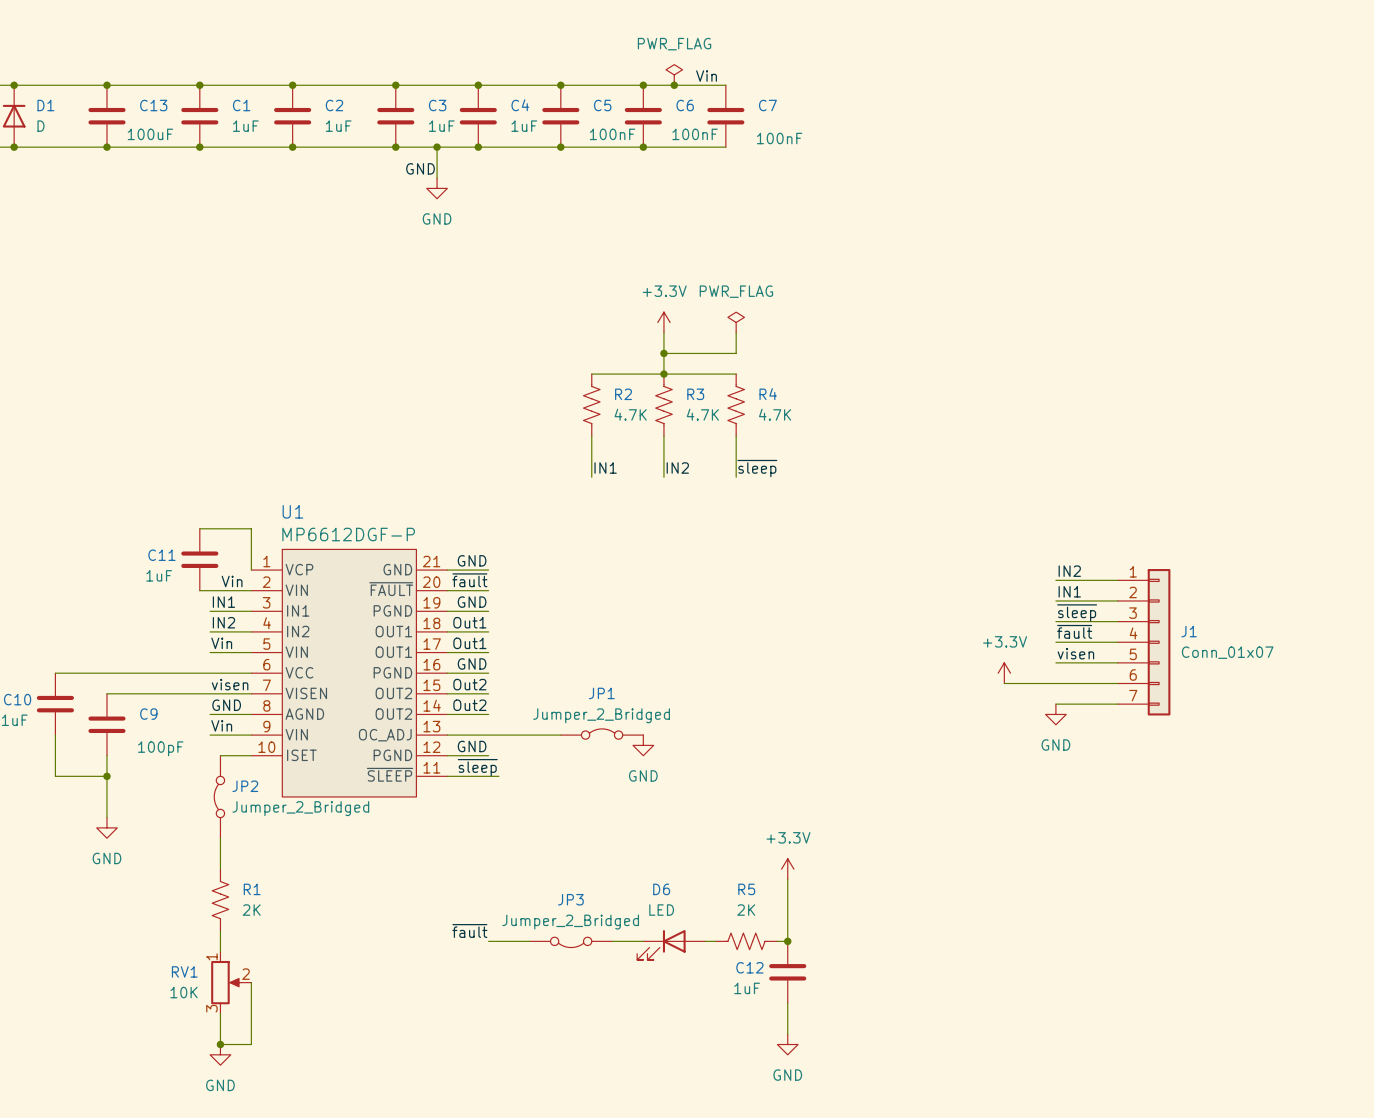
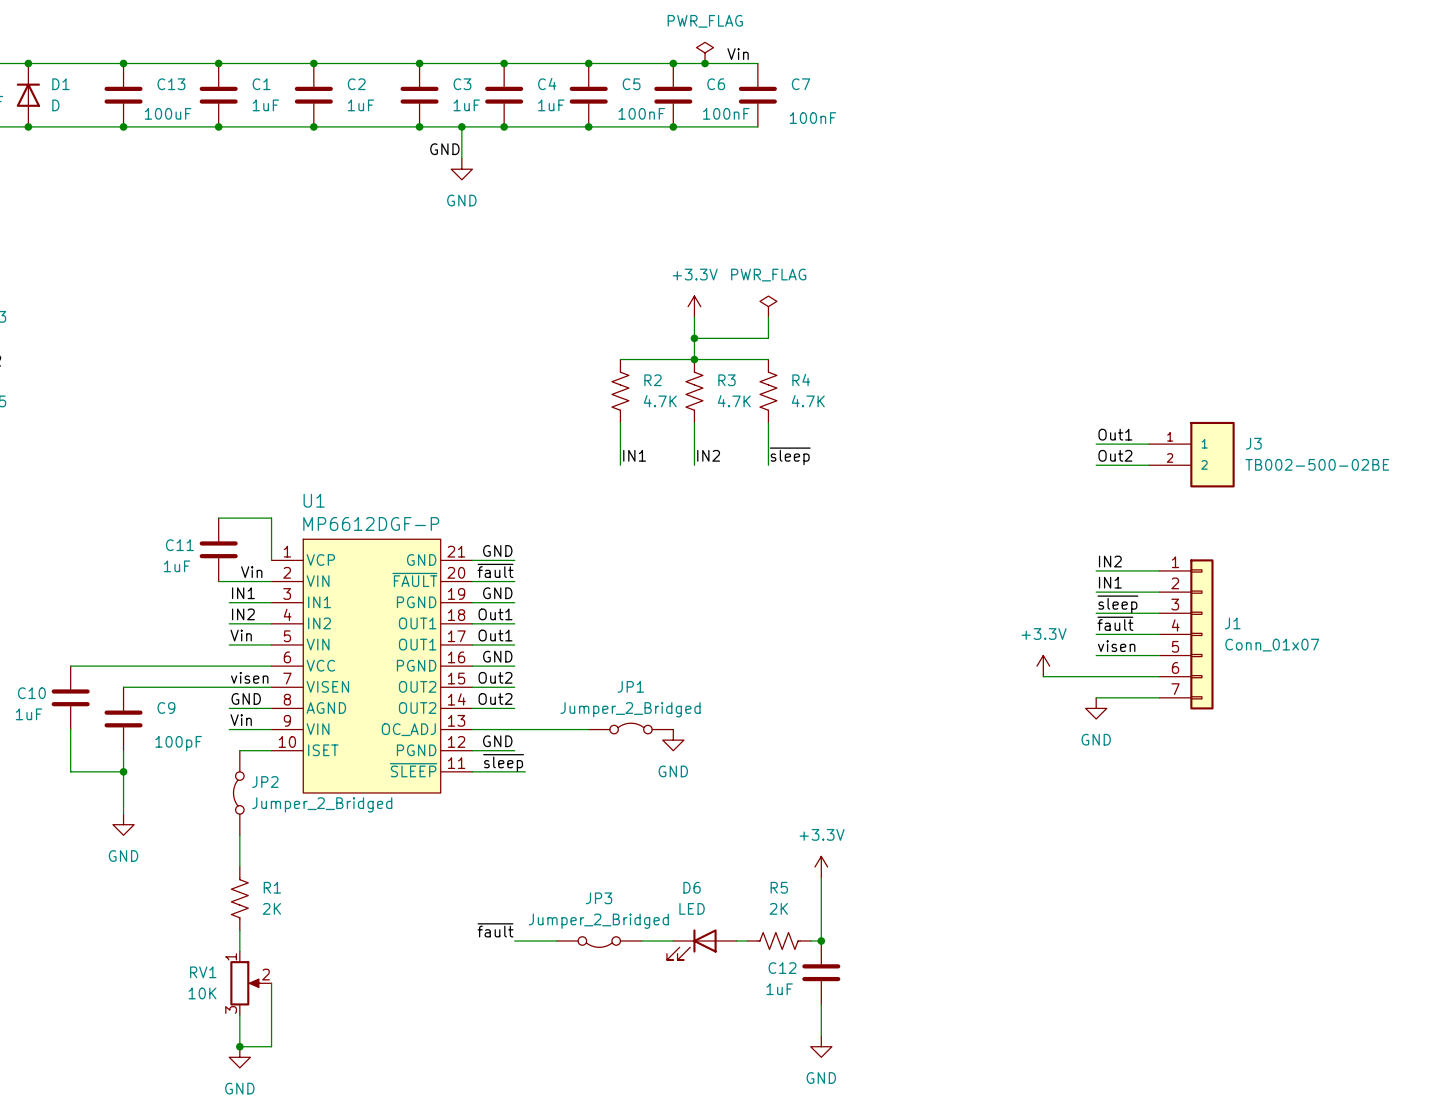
label: none -> Out1 (1115, 434)
wire: none -> (1096, 444) (1149, 444)
J3: none -> TB002-500-02BE (1191, 454)
label: none -> Out2 (1115, 455)
wire: none -> (1096, 465) (1149, 465)

